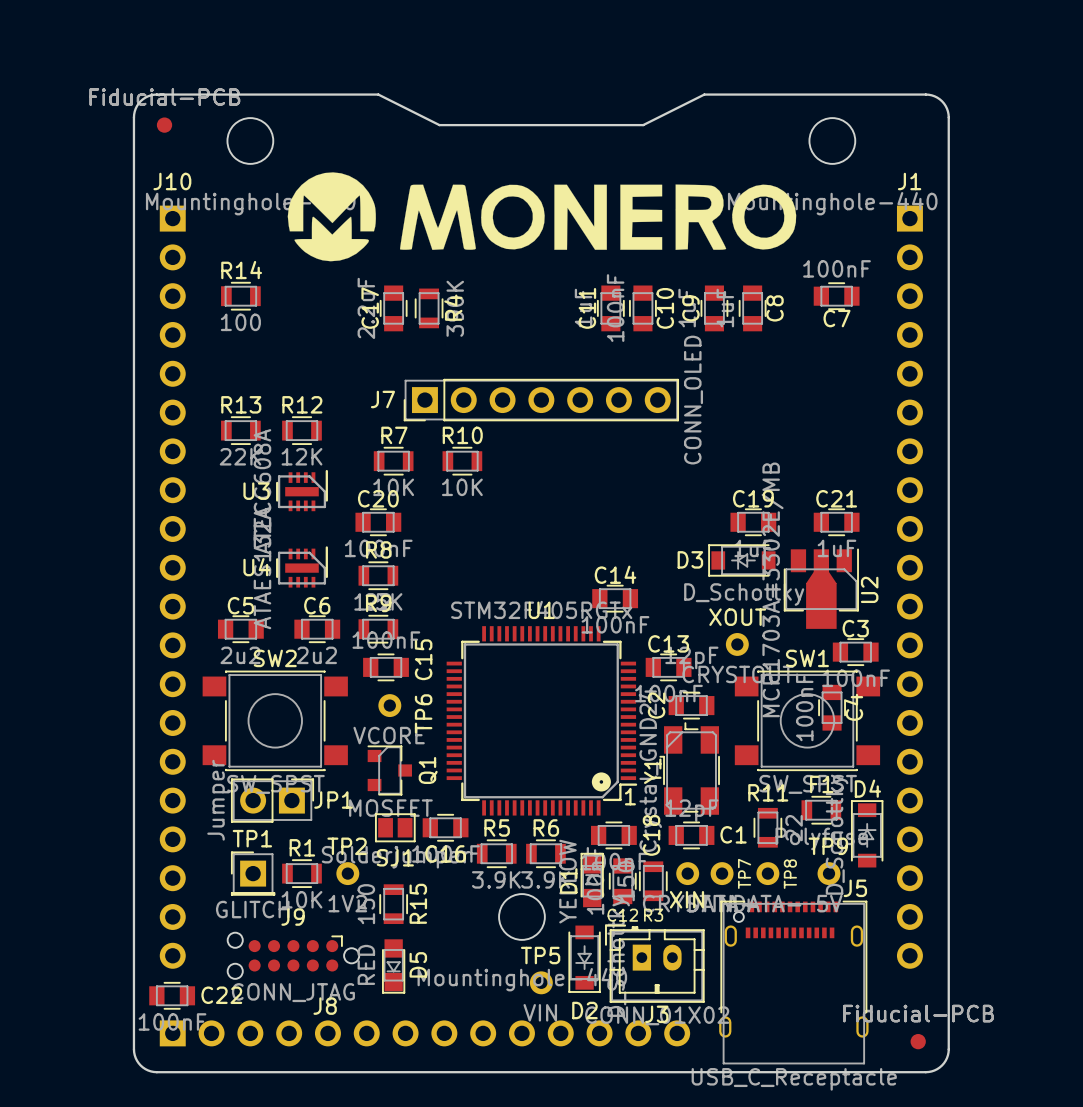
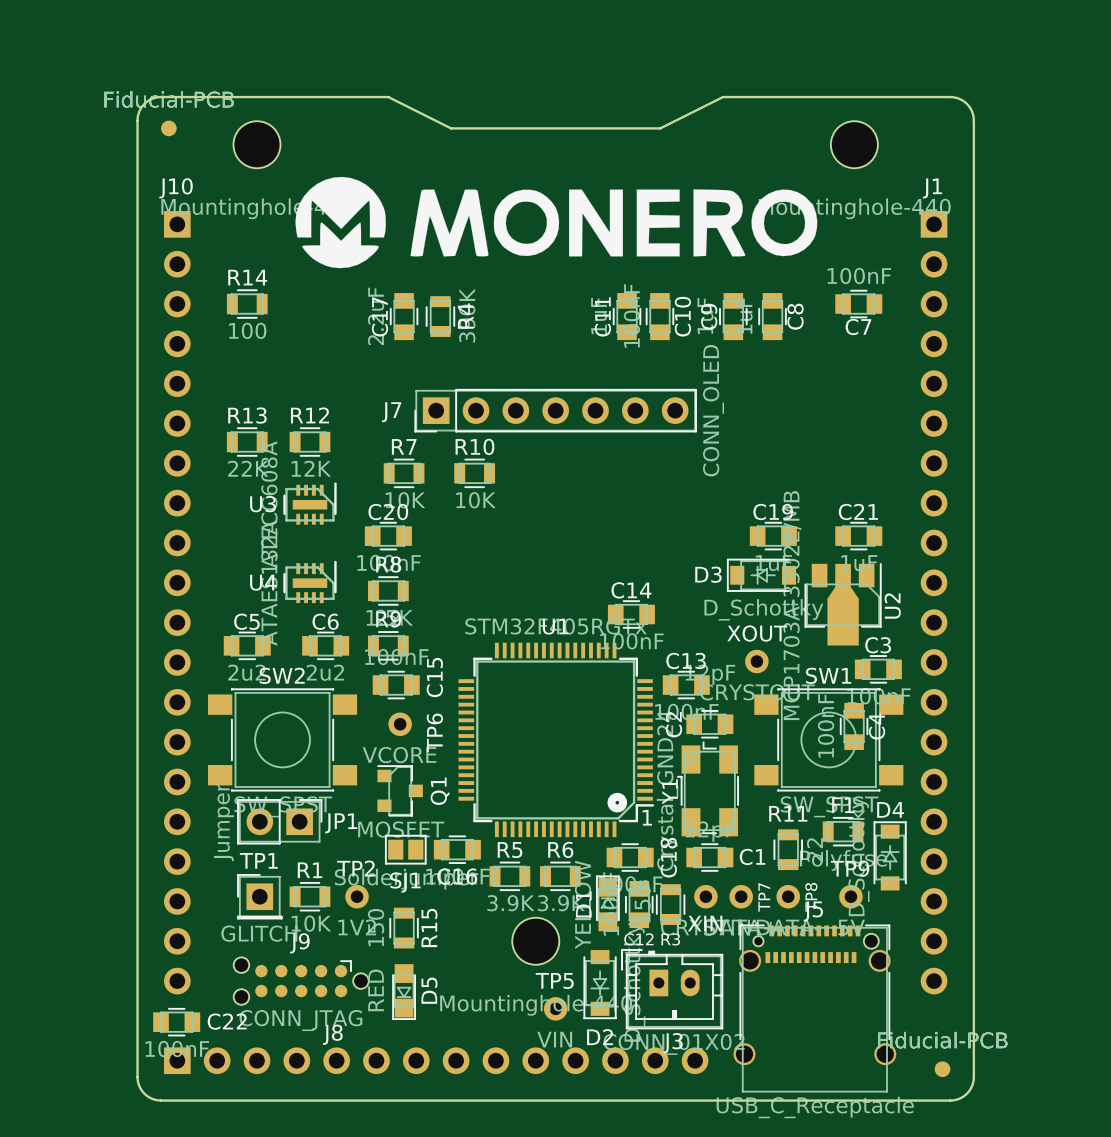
J5 name position: J5 (855, 888) -> J5 (813, 911)
J5 footprint: [719, 900, 869, 1065] -> [733, 924, 897, 1093]

